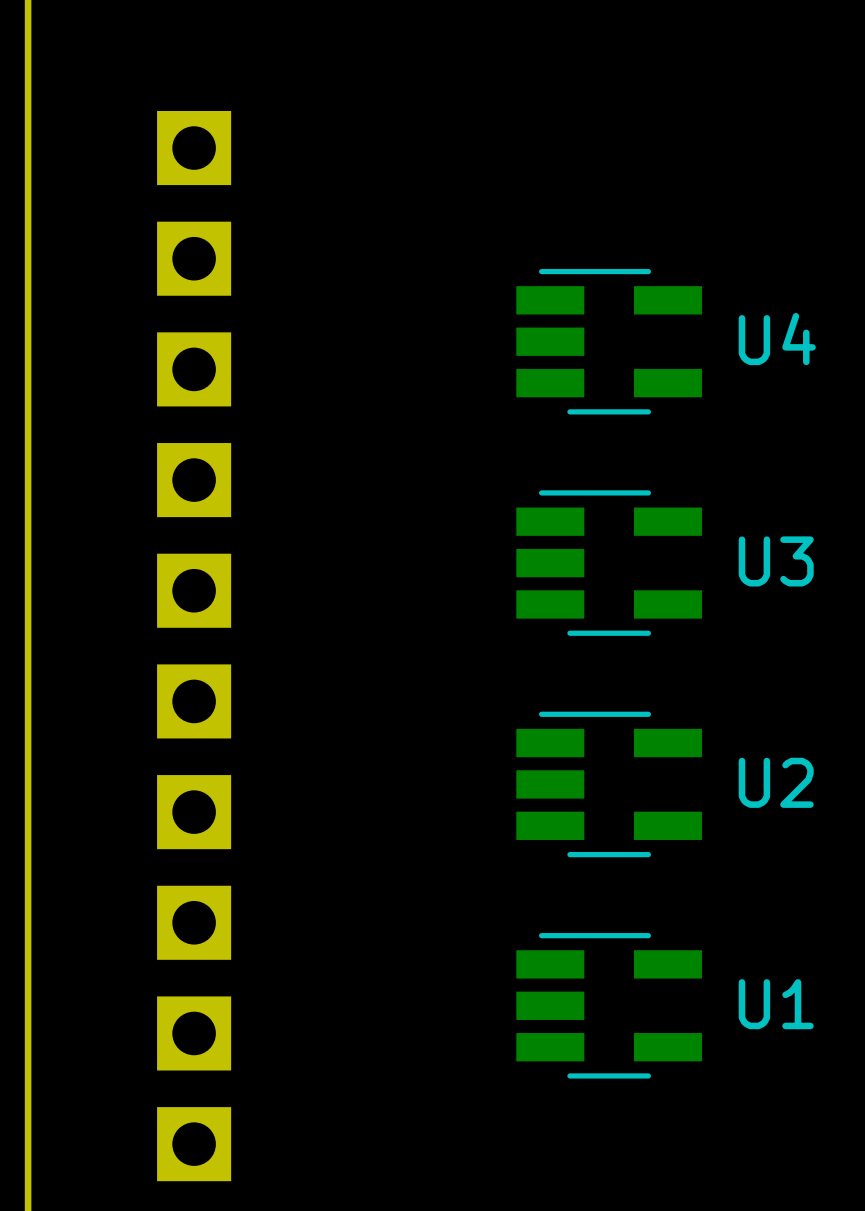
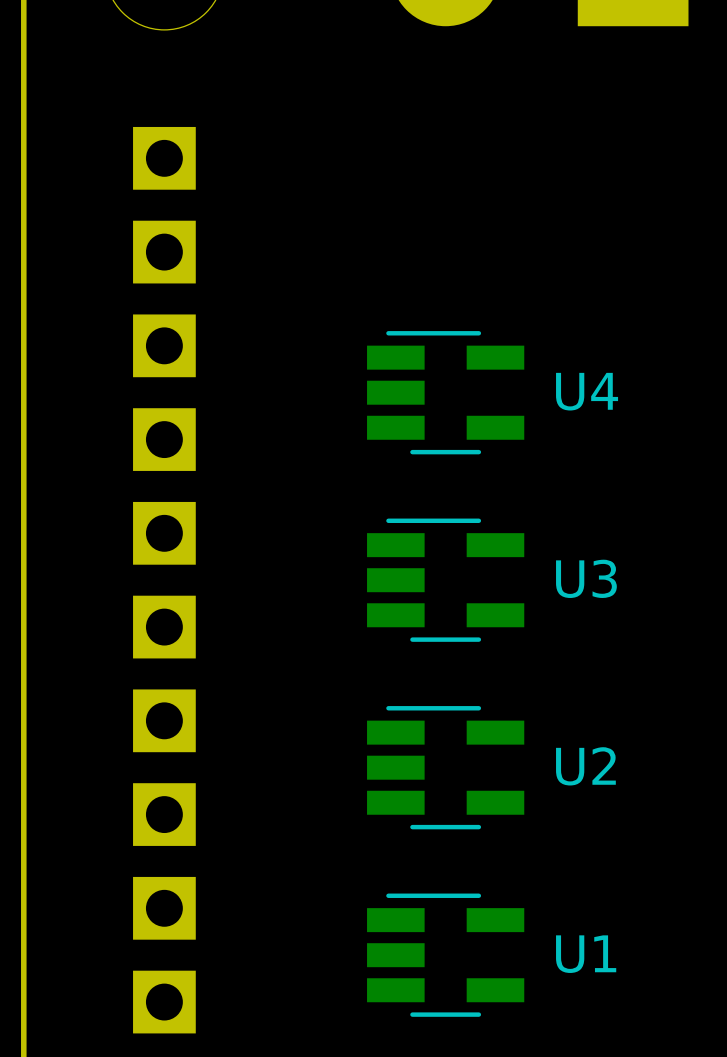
U4 position: (609, 341) -> (445, 392)
U3 position: (609, 563) -> (445, 580)
U2 position: (609, 784) -> (445, 767)
U1 position: (609, 1005) -> (445, 955)

